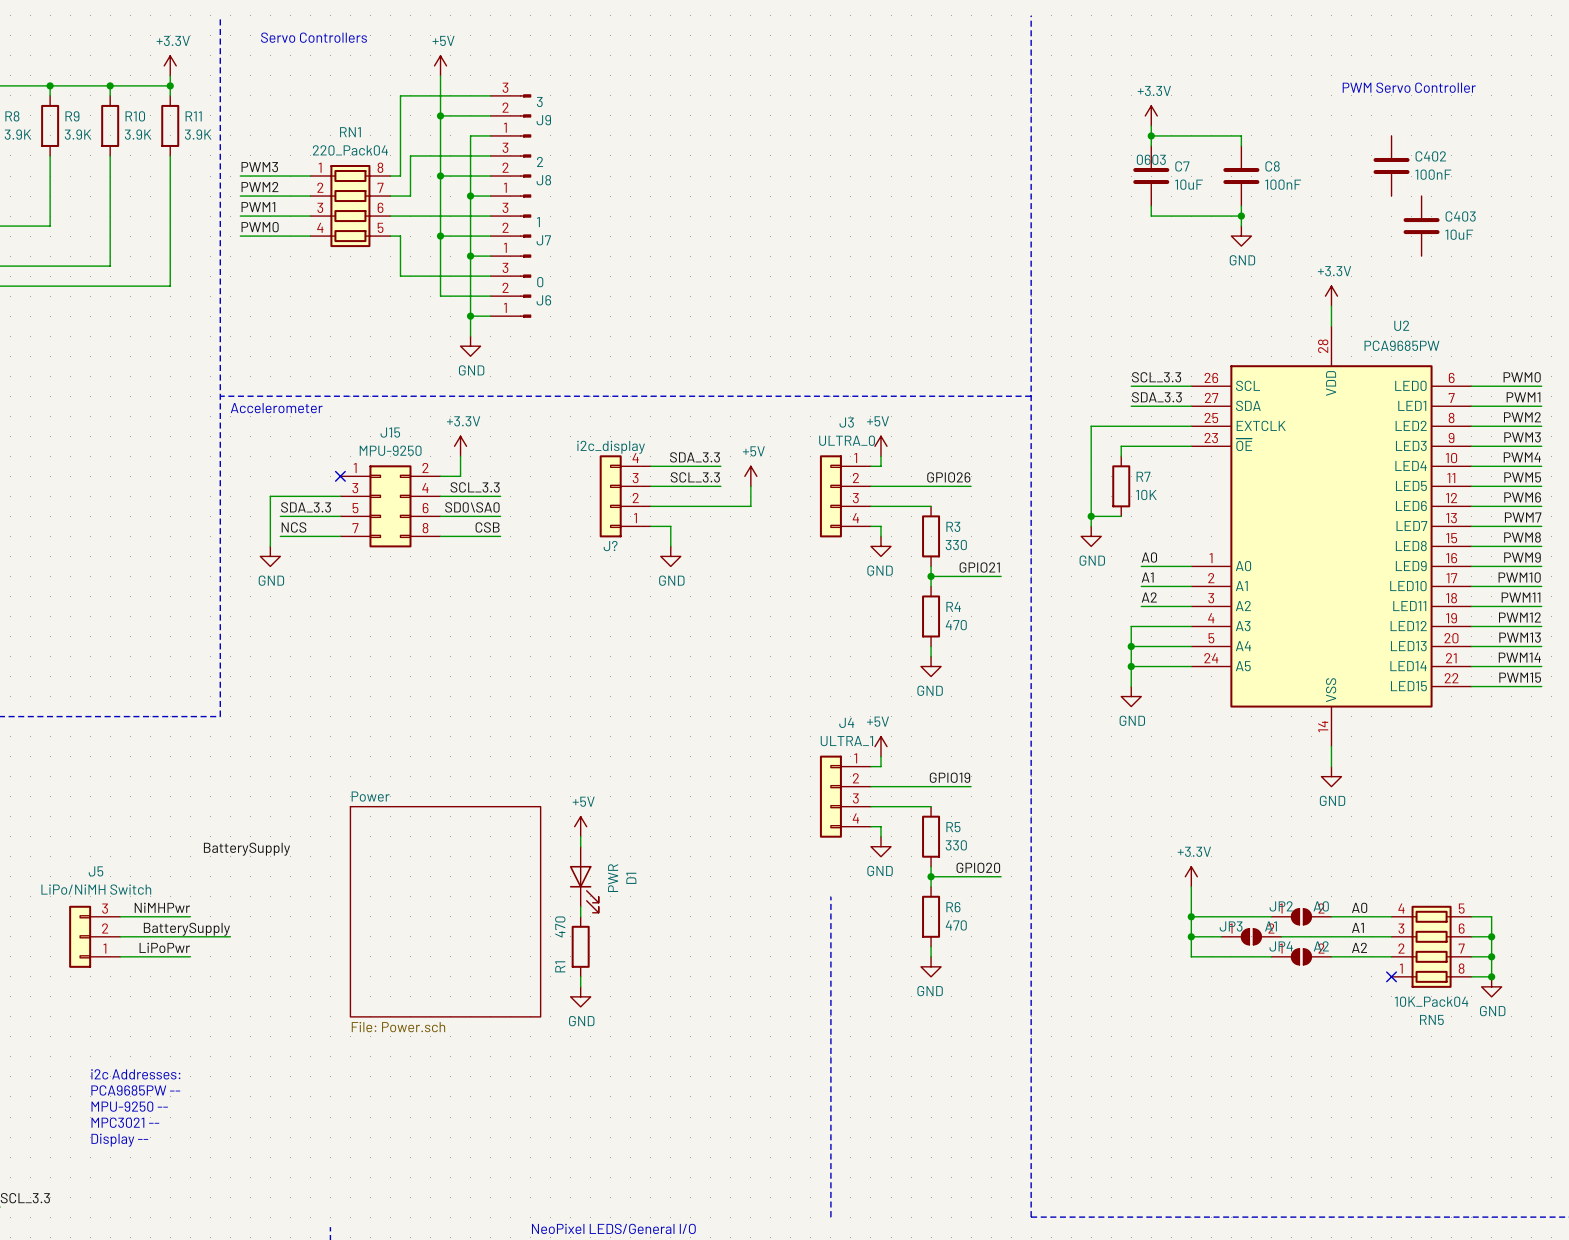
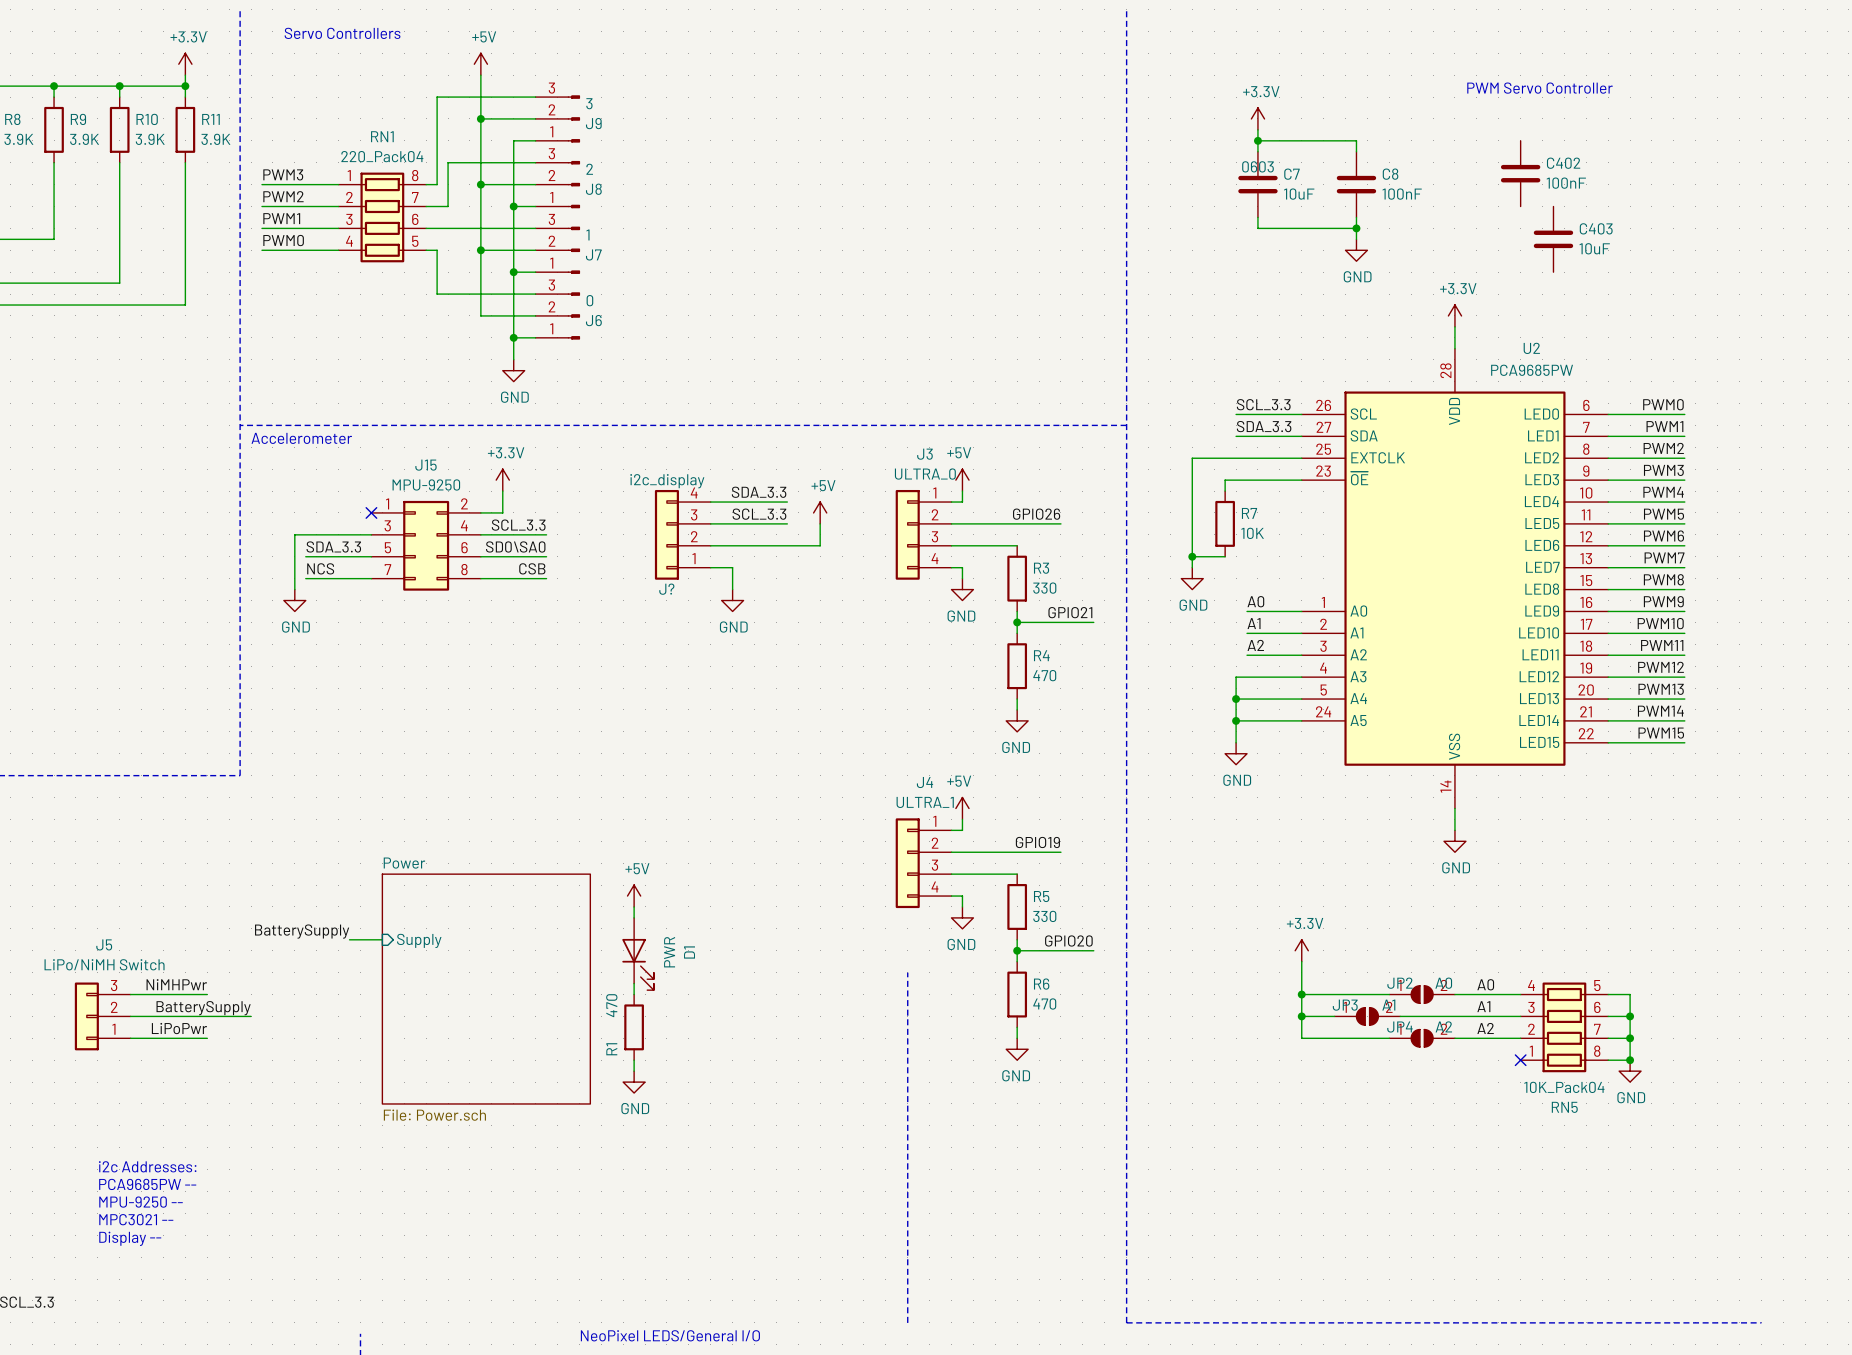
label position: BatterySupply (246, 849) -> BatterySupply (302, 931)
wire: none -> (349, 939) (382, 939)
sheet pin: none -> Supply (419, 940)

